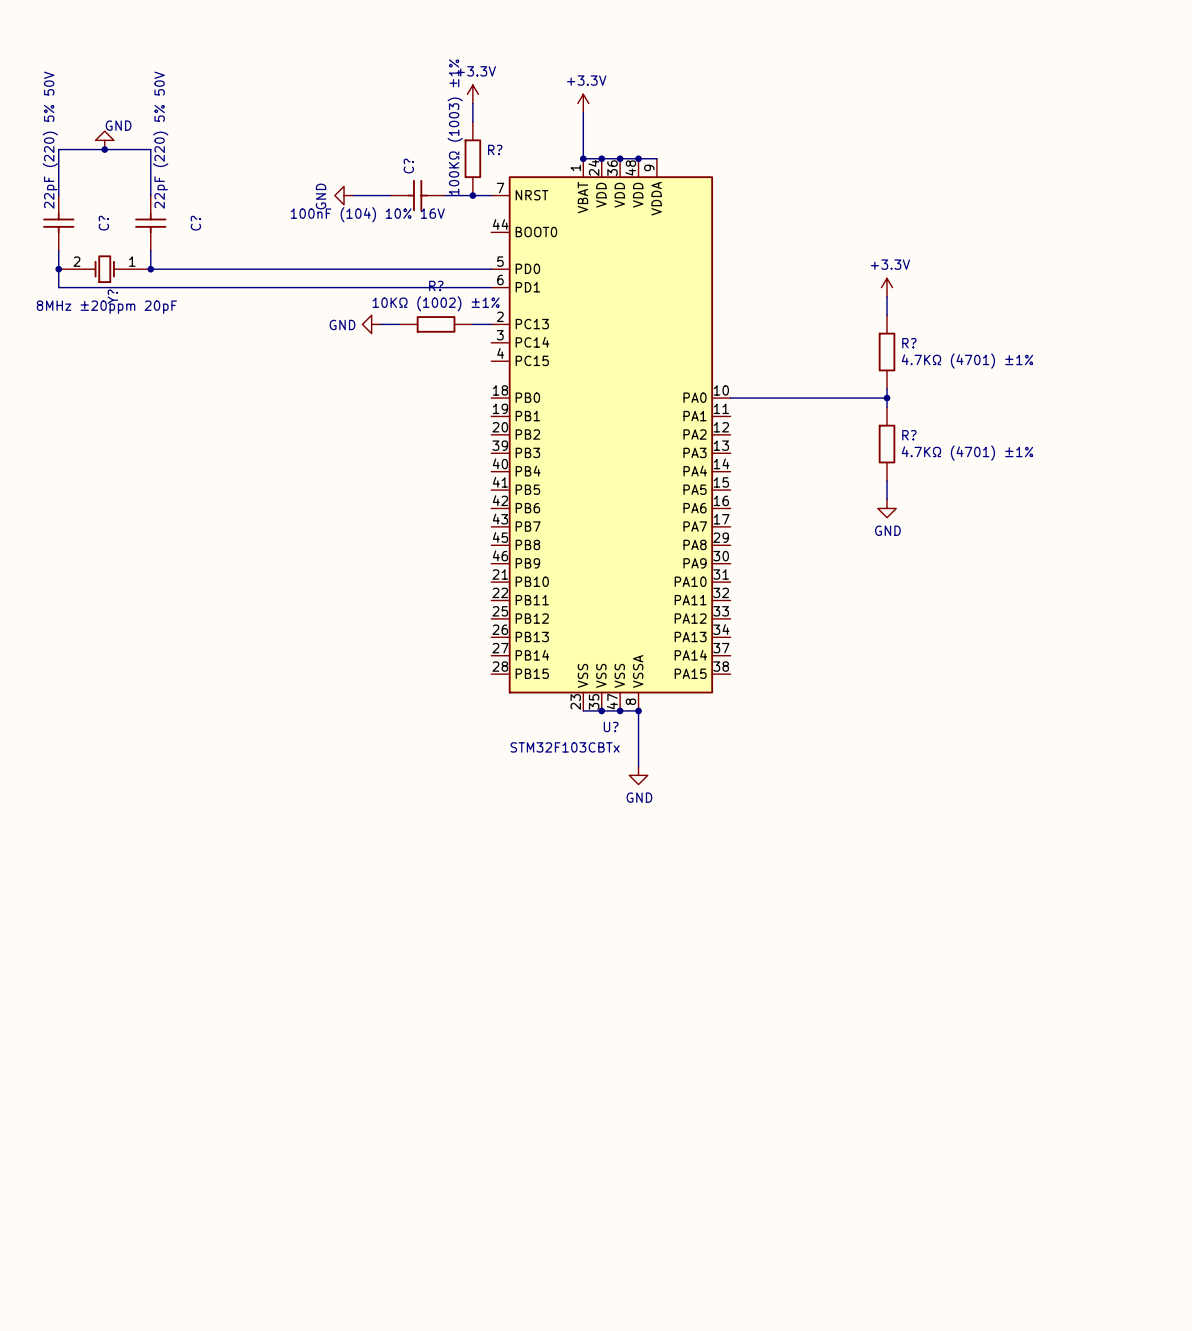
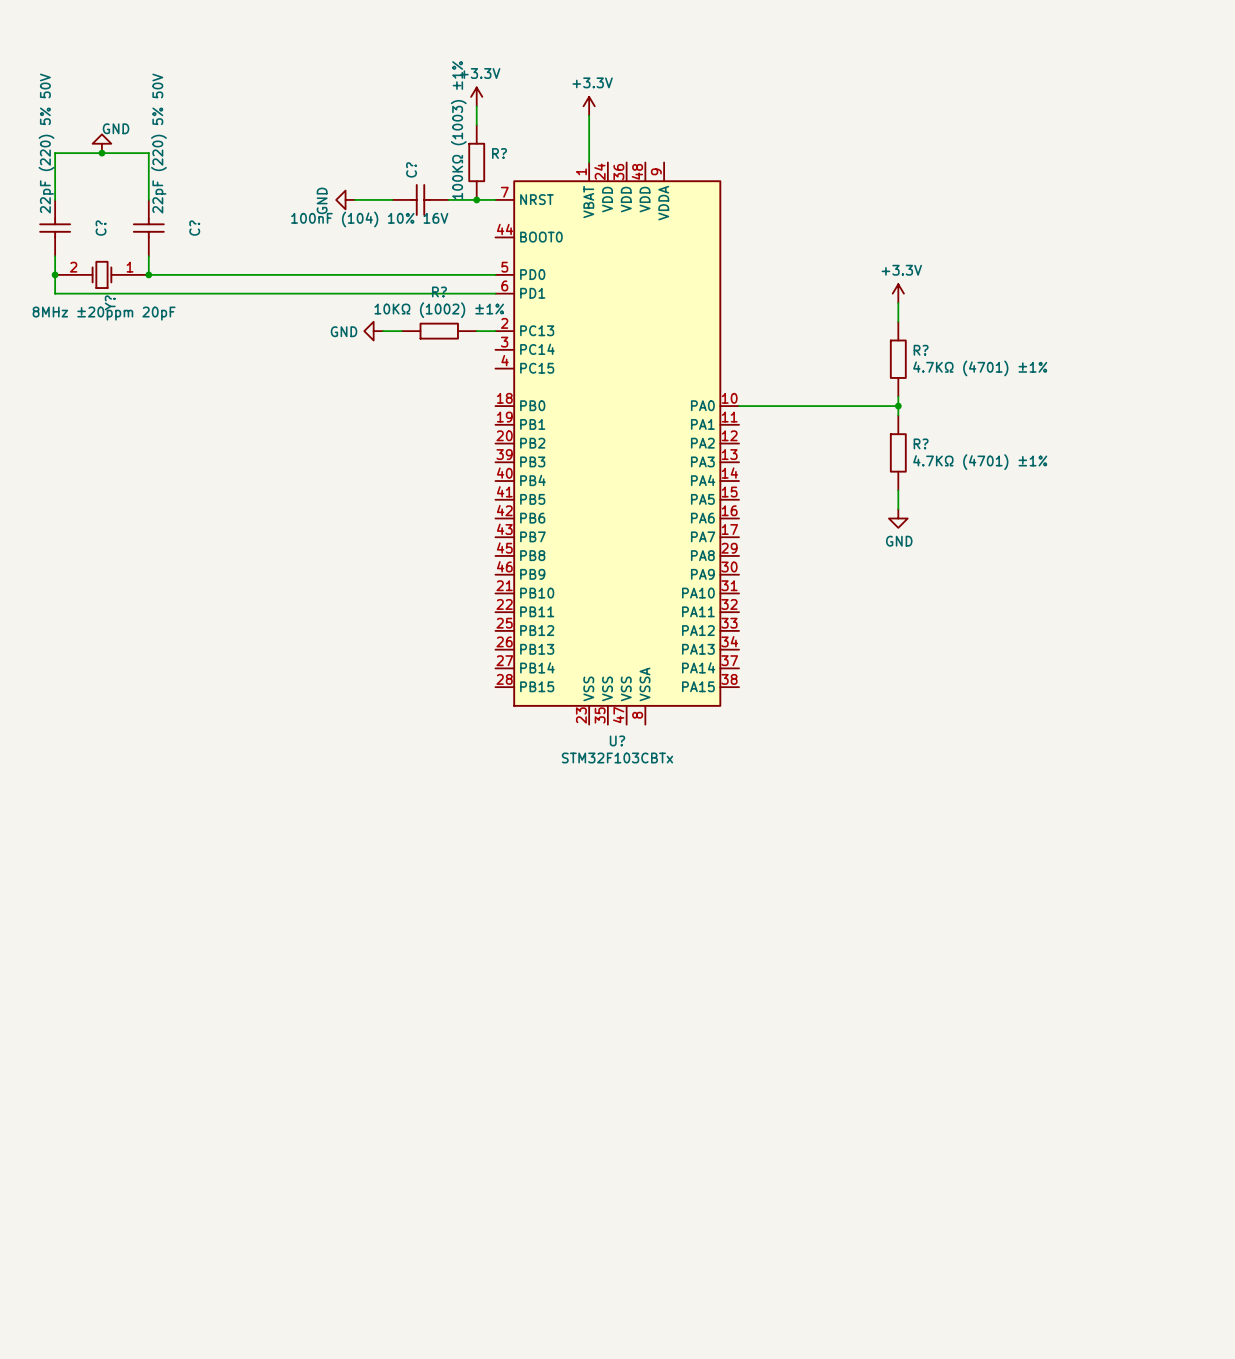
wire: (583, 158) (656, 158) -> none
junction: (583, 158) -> none
junction: (601, 158) -> none
junction: (620, 158) -> none
junction: (638, 158) -> none
wire: (583, 710) (638, 710) (638, 766) -> none
junction: (601, 710) -> none
junction: (620, 710) -> none
junction: (638, 710) -> none
U? value position: STM32F103CBTx (565, 747) -> STM32F103CBTx (617, 757)
power symbol: GND (638, 775) -> none

